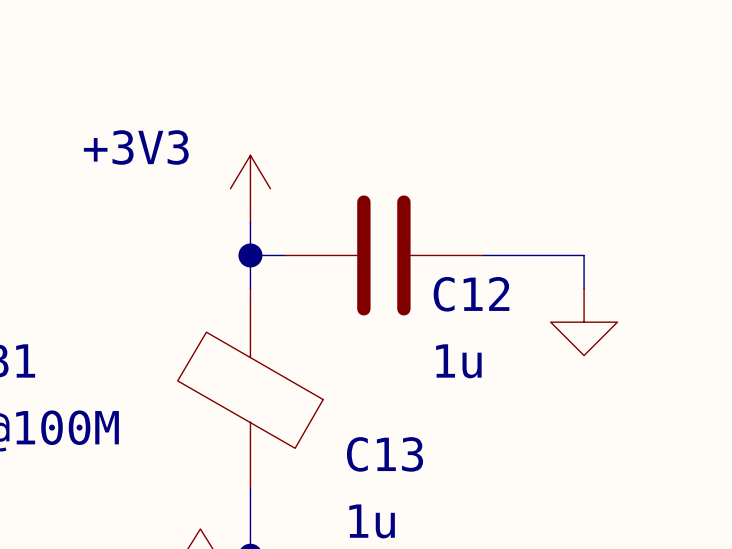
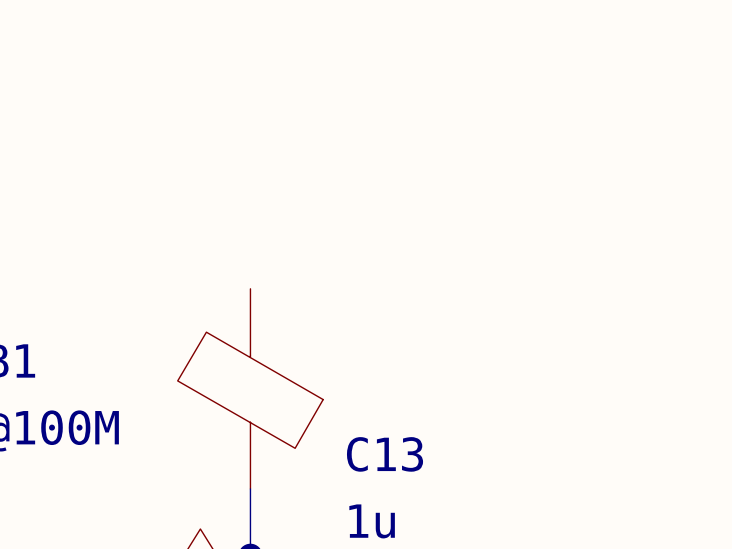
power symbol: +3V3 (250, 188) -> none
wire: (250, 222) (250, 288) -> none
wire: (250, 255) (283, 255) -> none
junction: (250, 255) -> none
C12: 1u (383, 255) -> none
wire: (483, 255) (584, 255) (584, 288) -> none
power symbol: (584, 322) -> none

